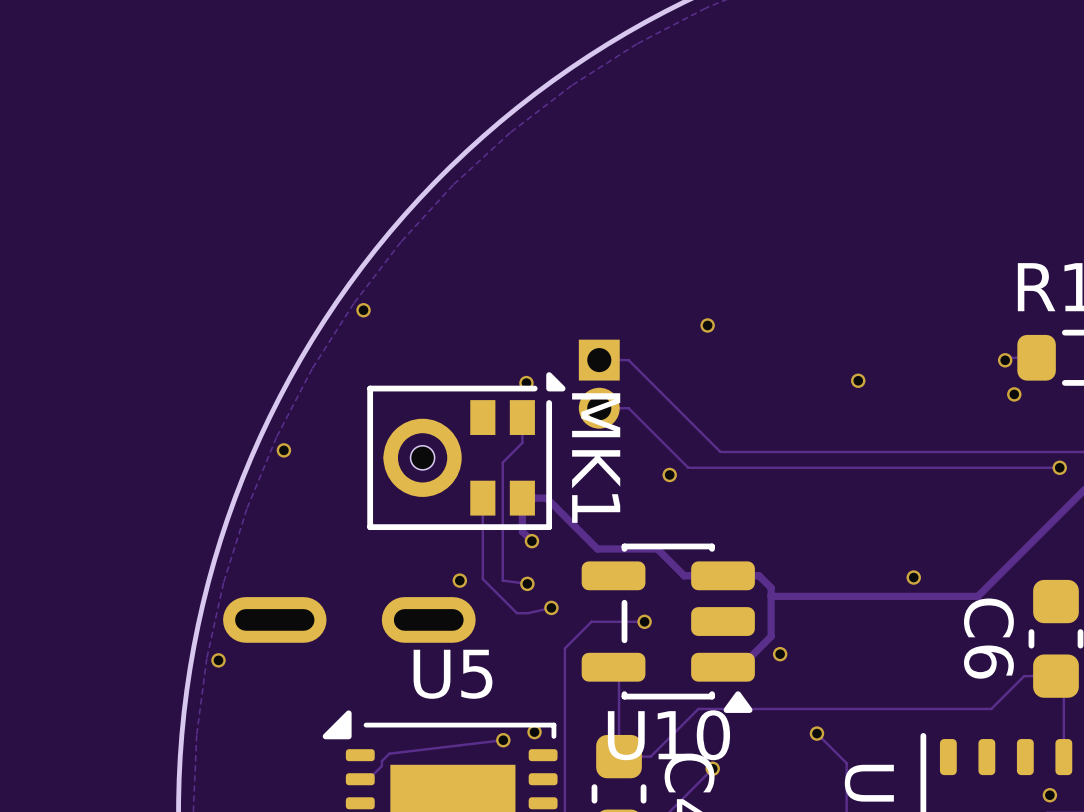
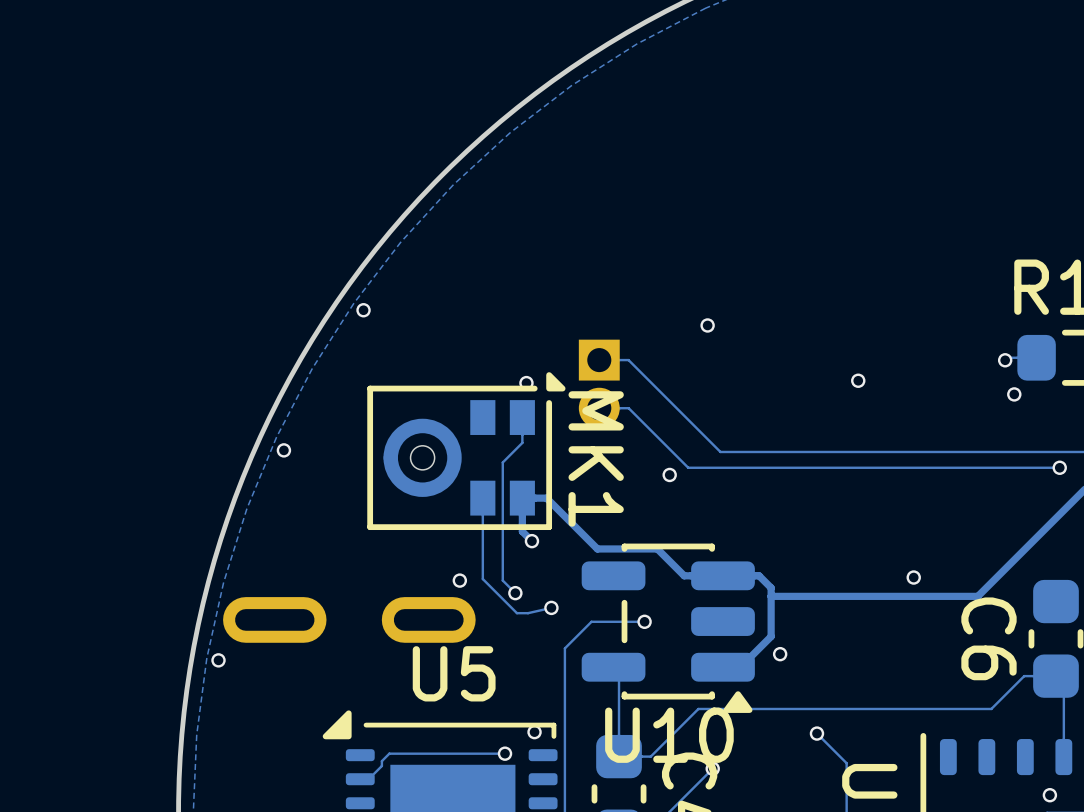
track: (502, 580) (527, 583) -> (502, 580) (515, 593)
via position: (527, 583) -> (515, 593)
track: (503, 740) (389, 753) -> (505, 753) (389, 753)
via position: (503, 740) -> (505, 753)

